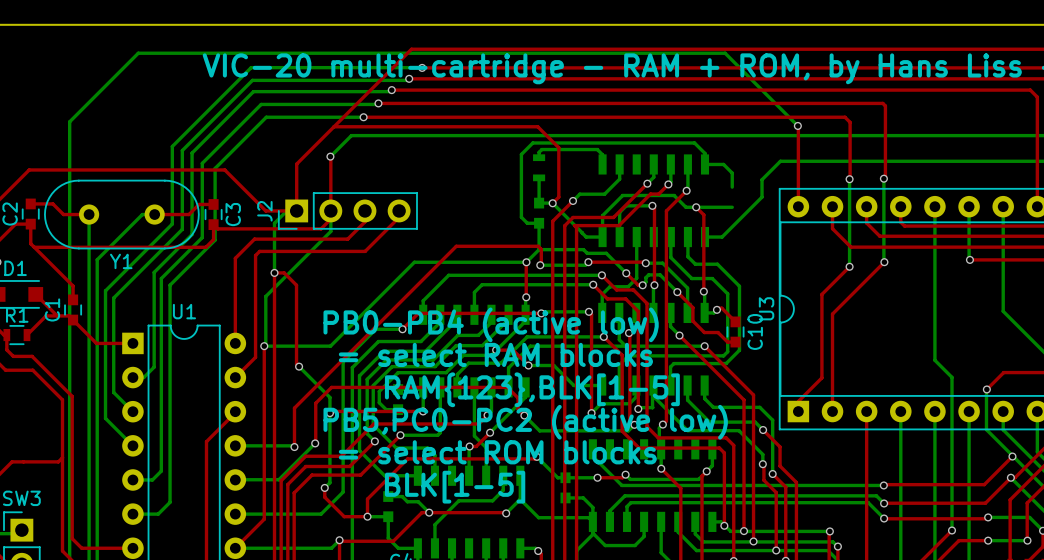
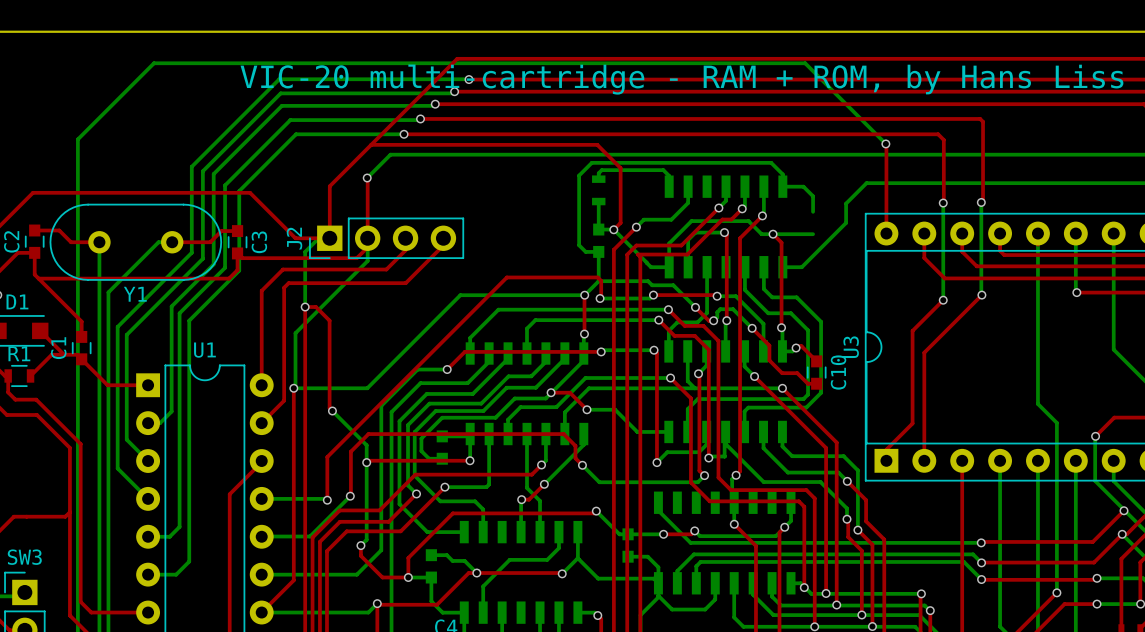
text: PB0-PB4 (active low) (491, 324) -> none
text: = select RAM blocks (495, 354) -> none
text: RAM{123},BLK[1-5] (532, 389) -> none
text: PB5,PC0-PC2 (active low) (525, 422) -> none
text: = select ROM blocks (497, 452) -> none
text: BLK[1-5] (455, 487) -> none

